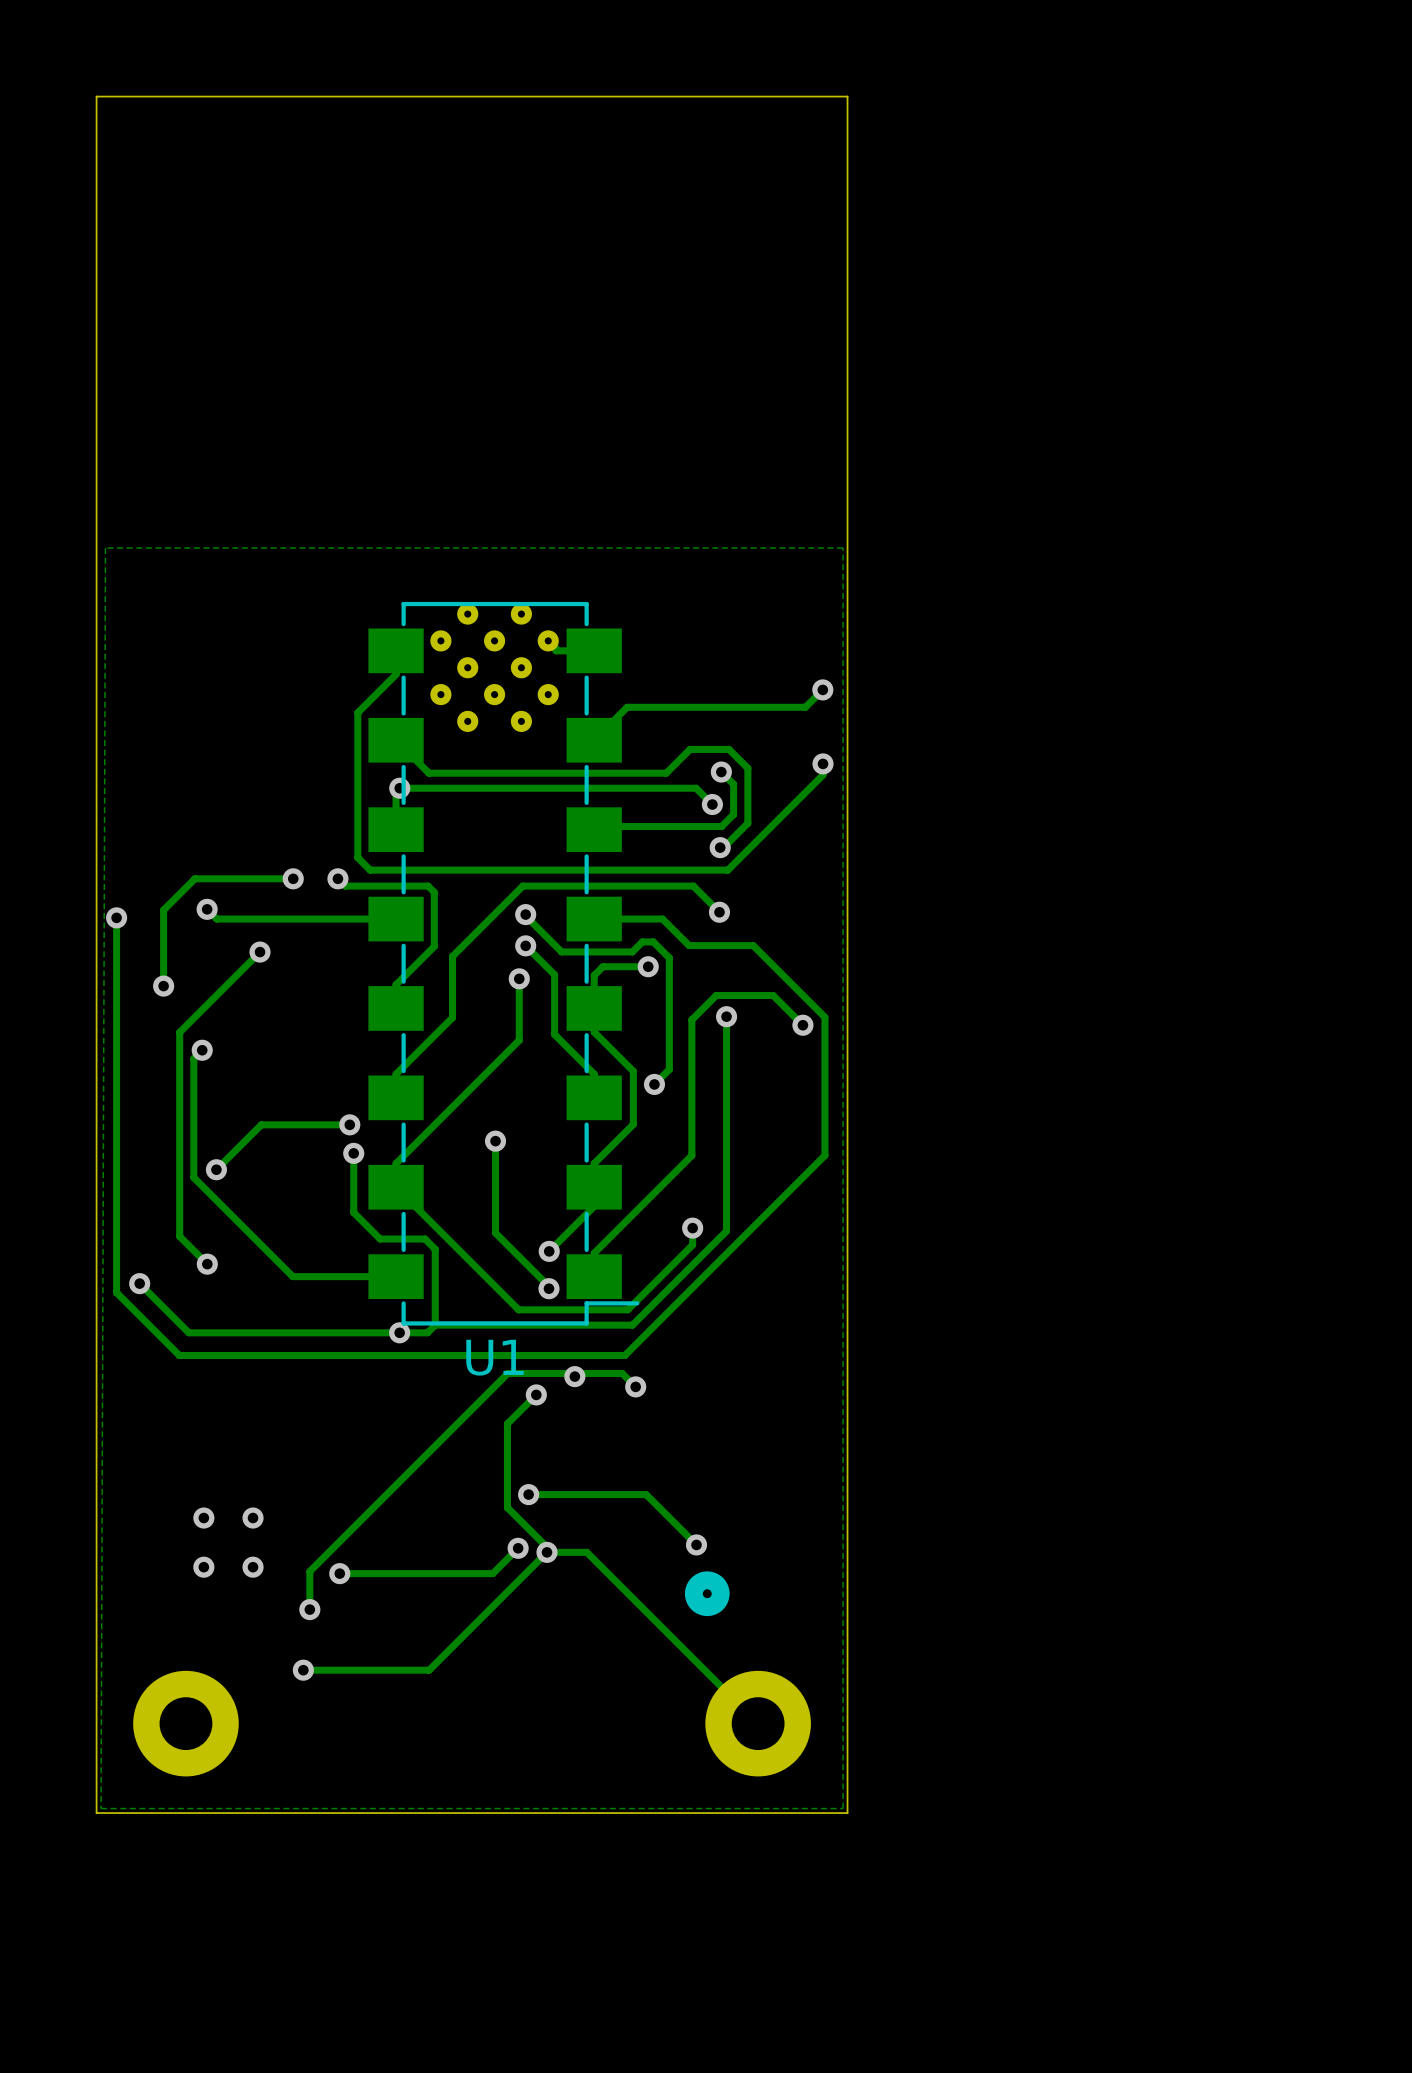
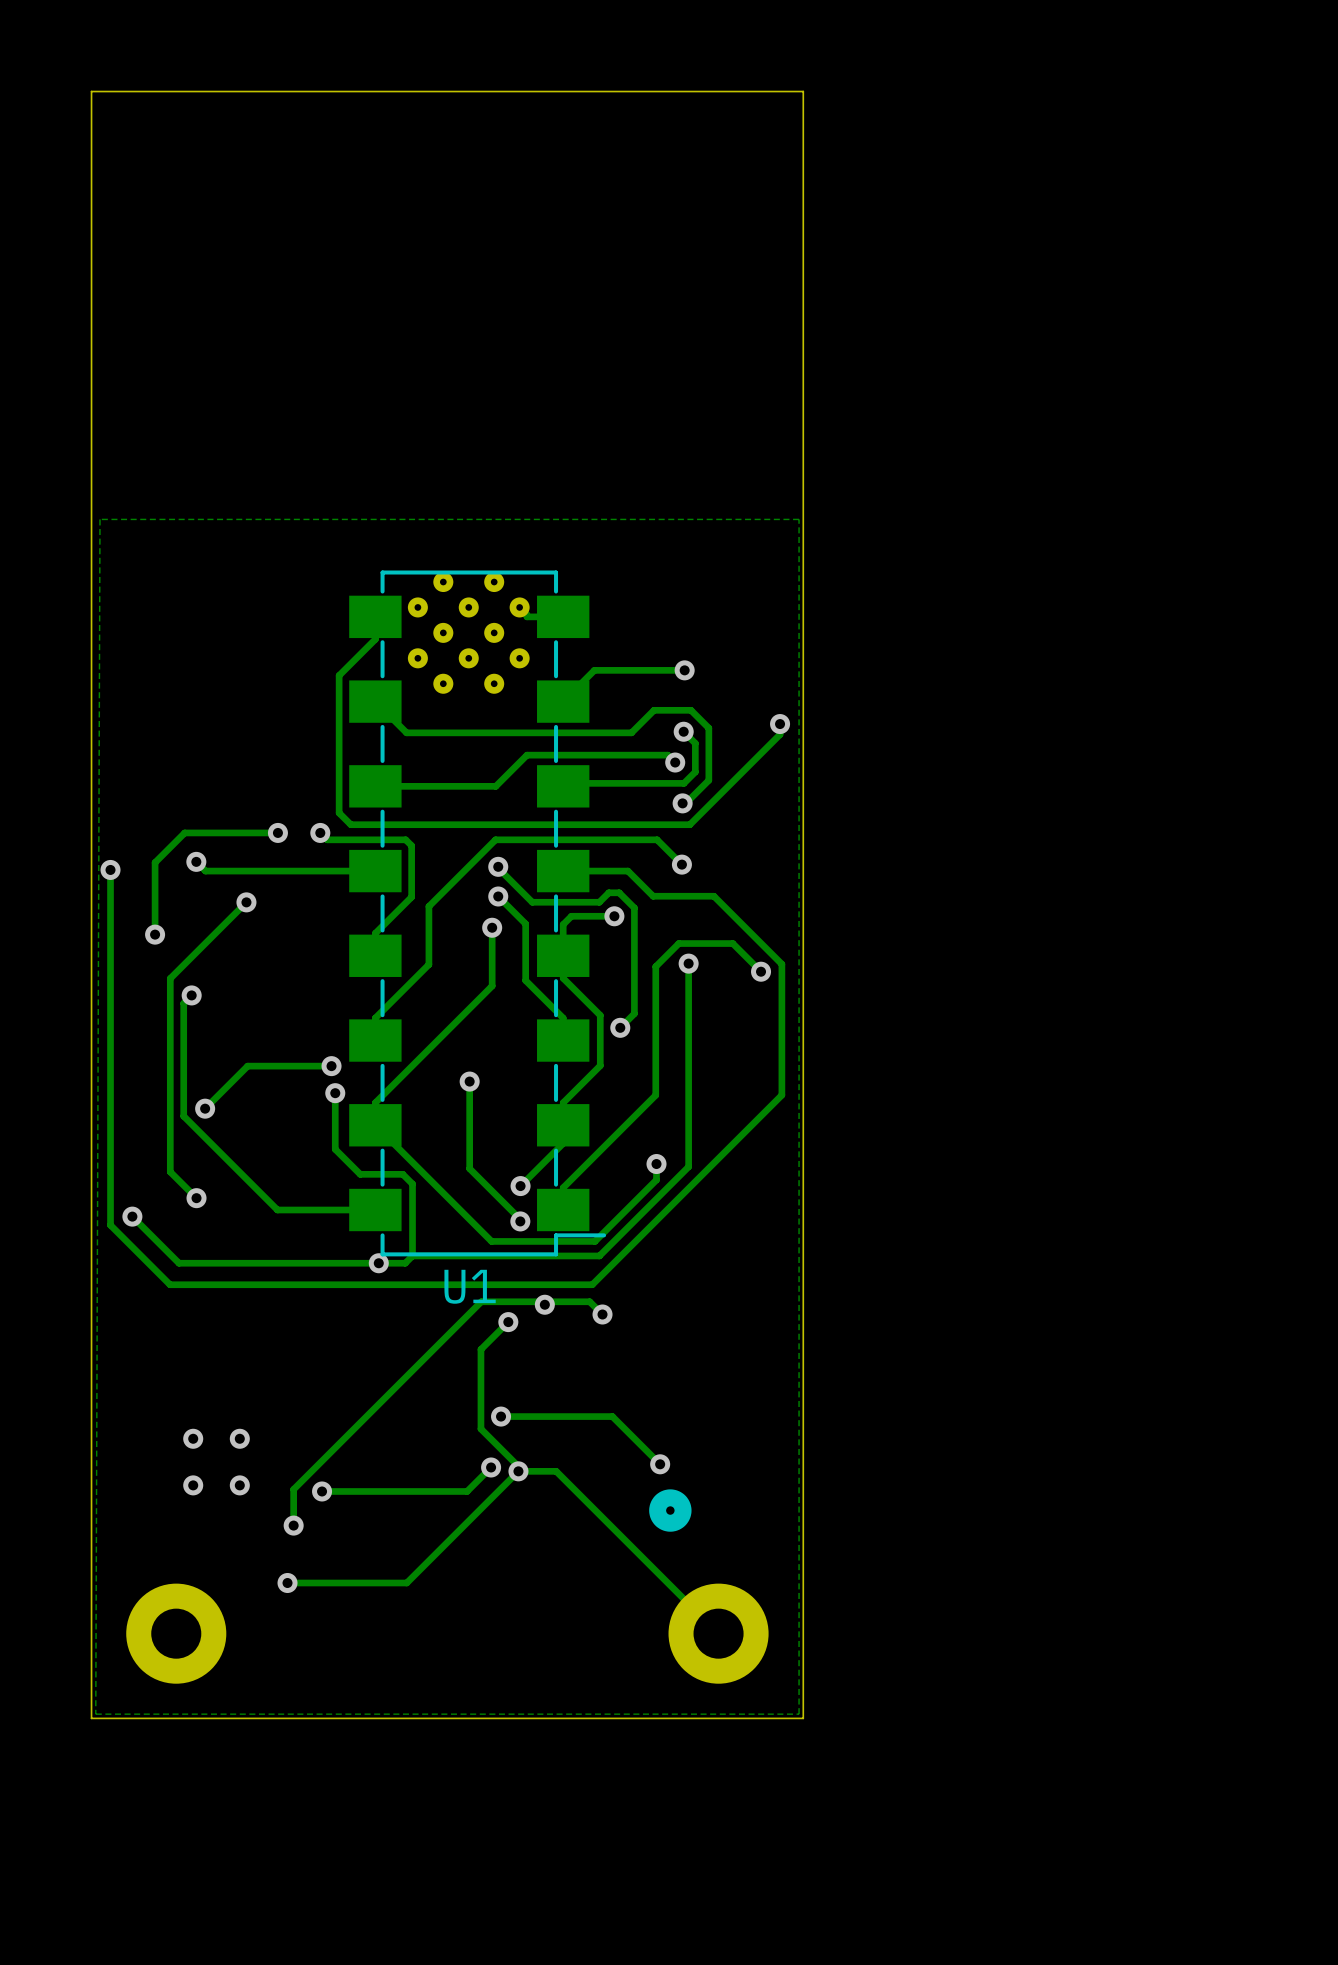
track: (822, 689) (805, 707) (722, 707) -> none
via position: (822, 689) -> (684, 670)
via: (399, 788) -> none
track: (704, 796) (696, 788) (399, 788) (396, 791) (396, 829) -> (667, 755) (527, 755) (495, 786) (375, 786)

